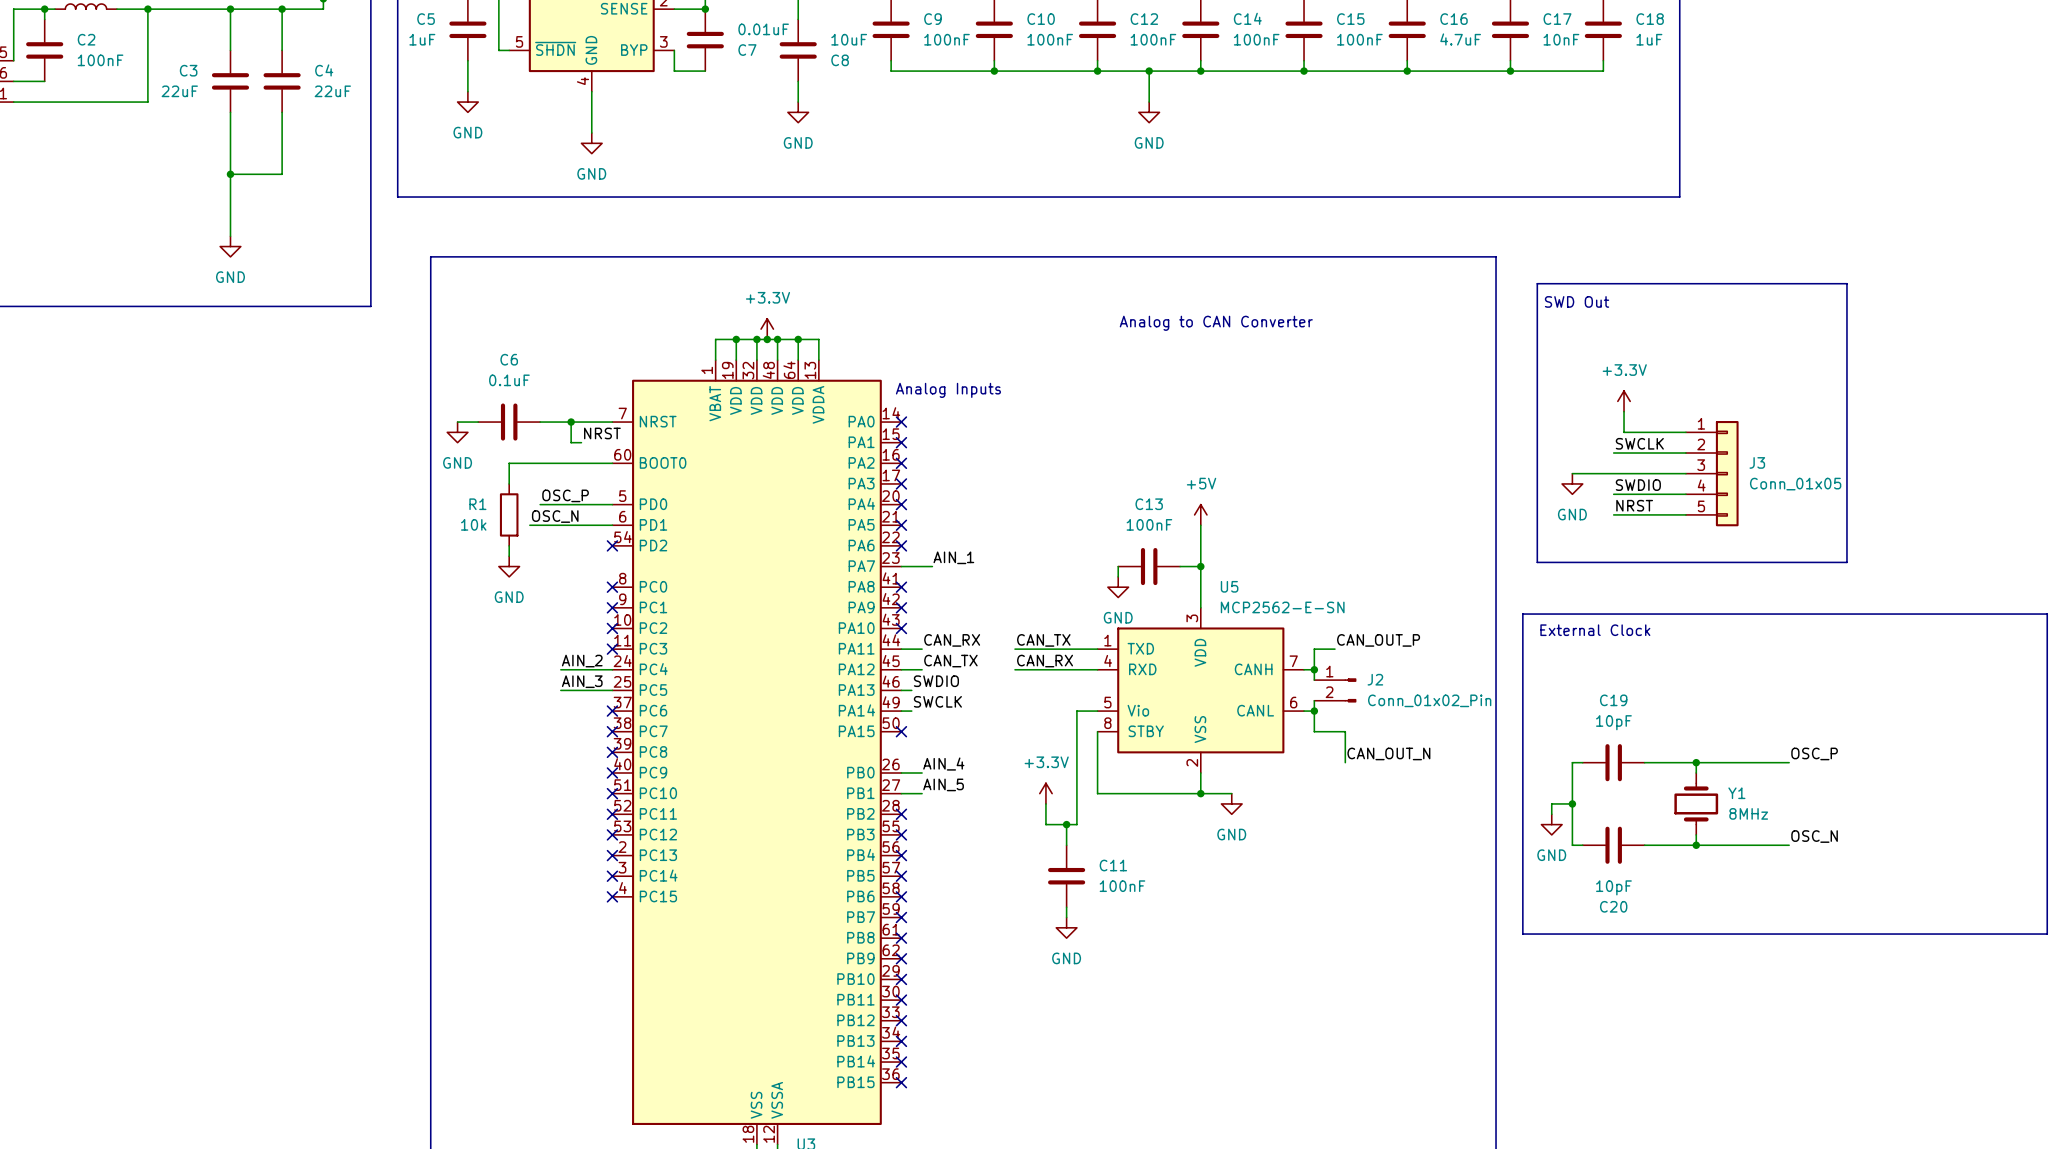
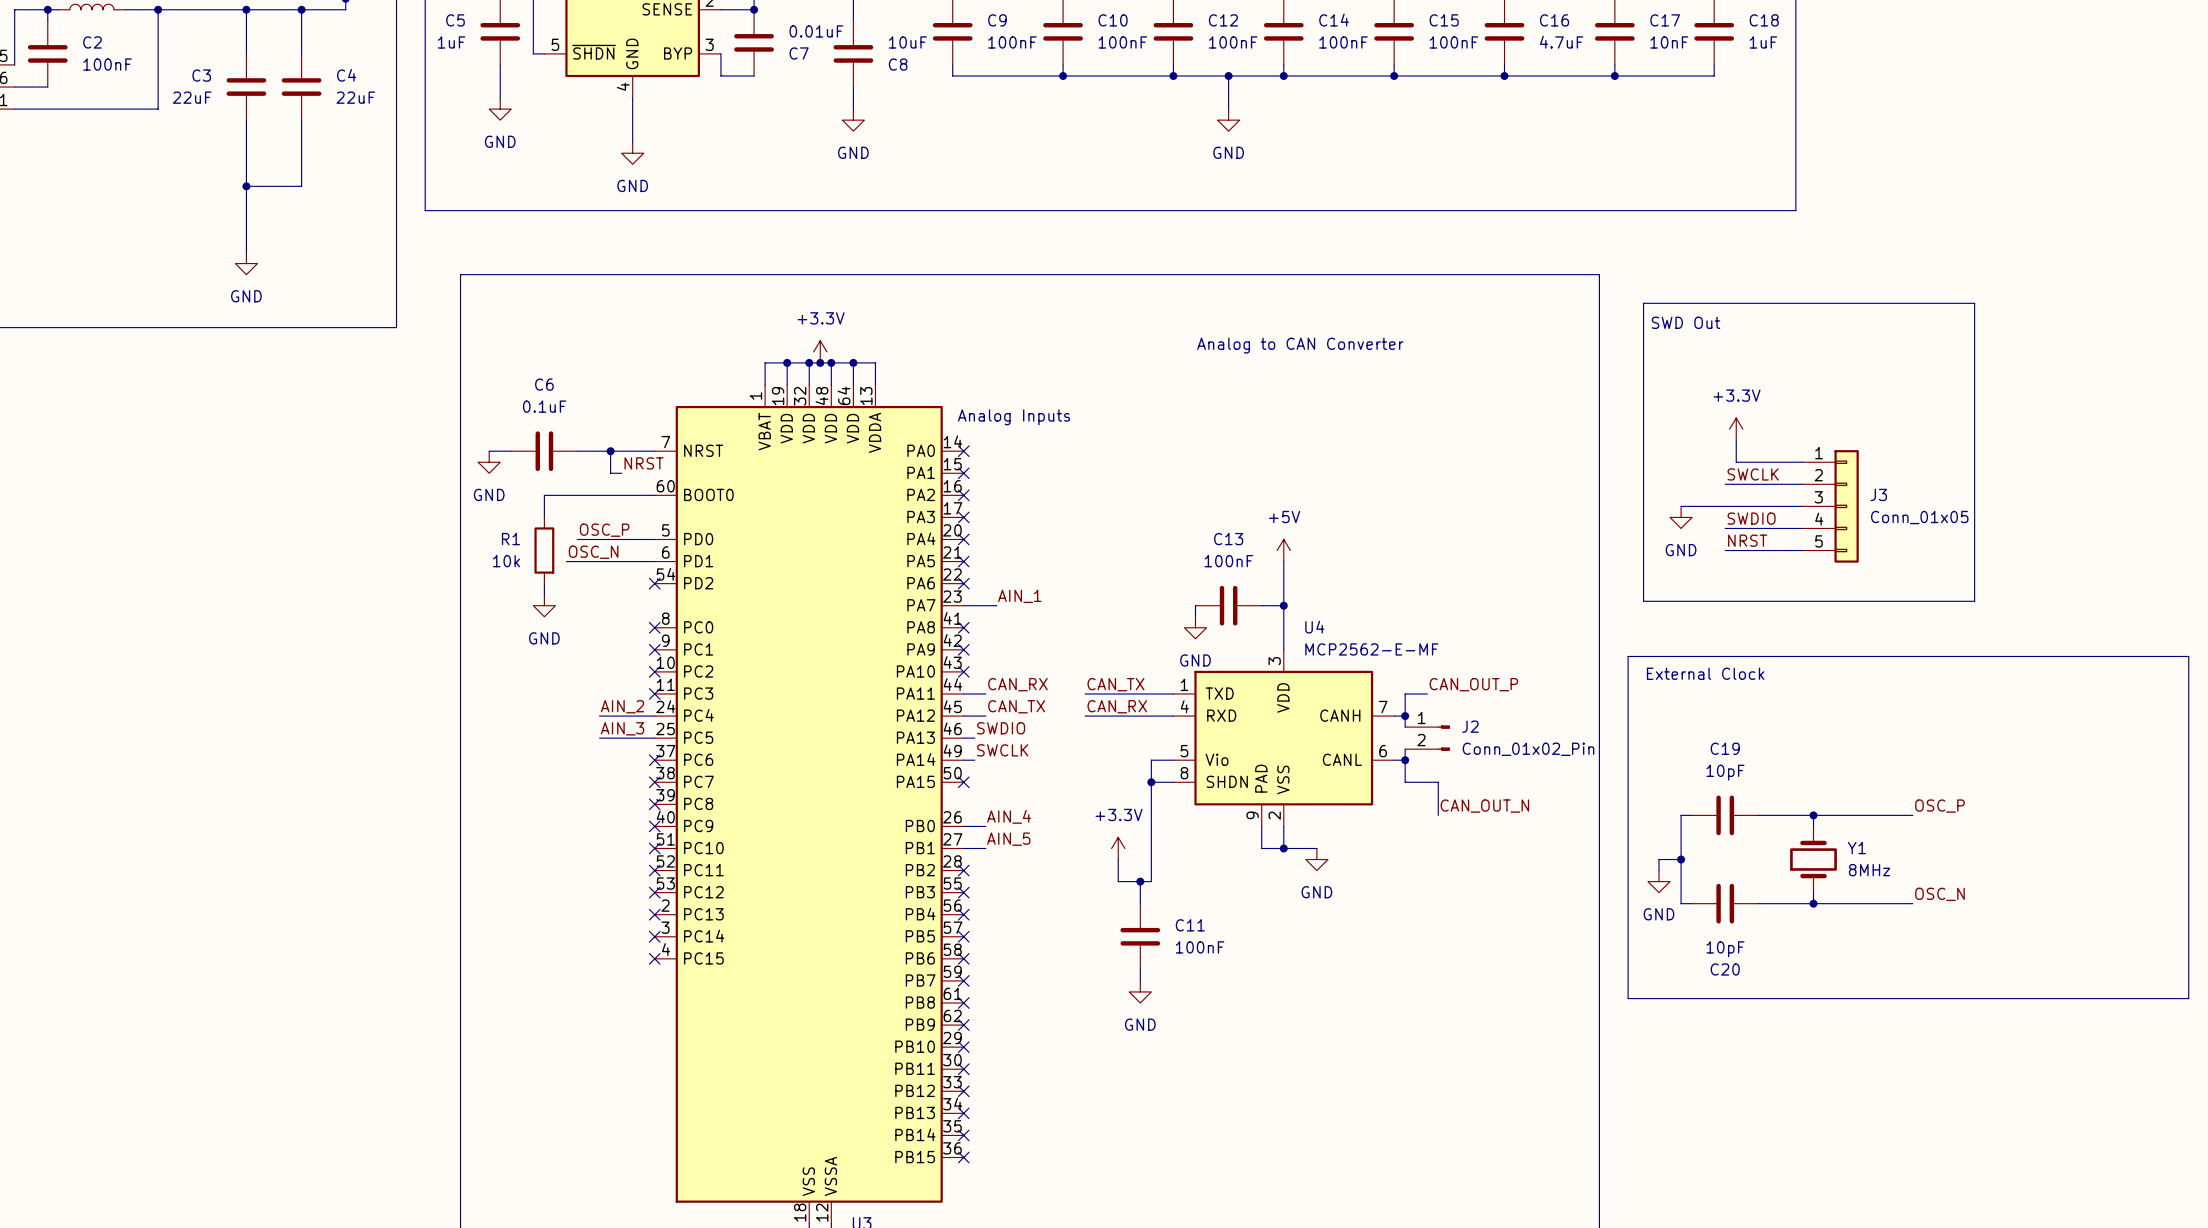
U5: MCP2562-E-SN (1200, 690) -> none
U4: none -> MCP2562-E-MF (1283, 738)
wire: none -> (1151, 782) (1173, 782)
junction: none -> (1151, 782)
wire: (1097, 731) (1097, 793) (1180, 793) -> (1261, 826) (1261, 848)

